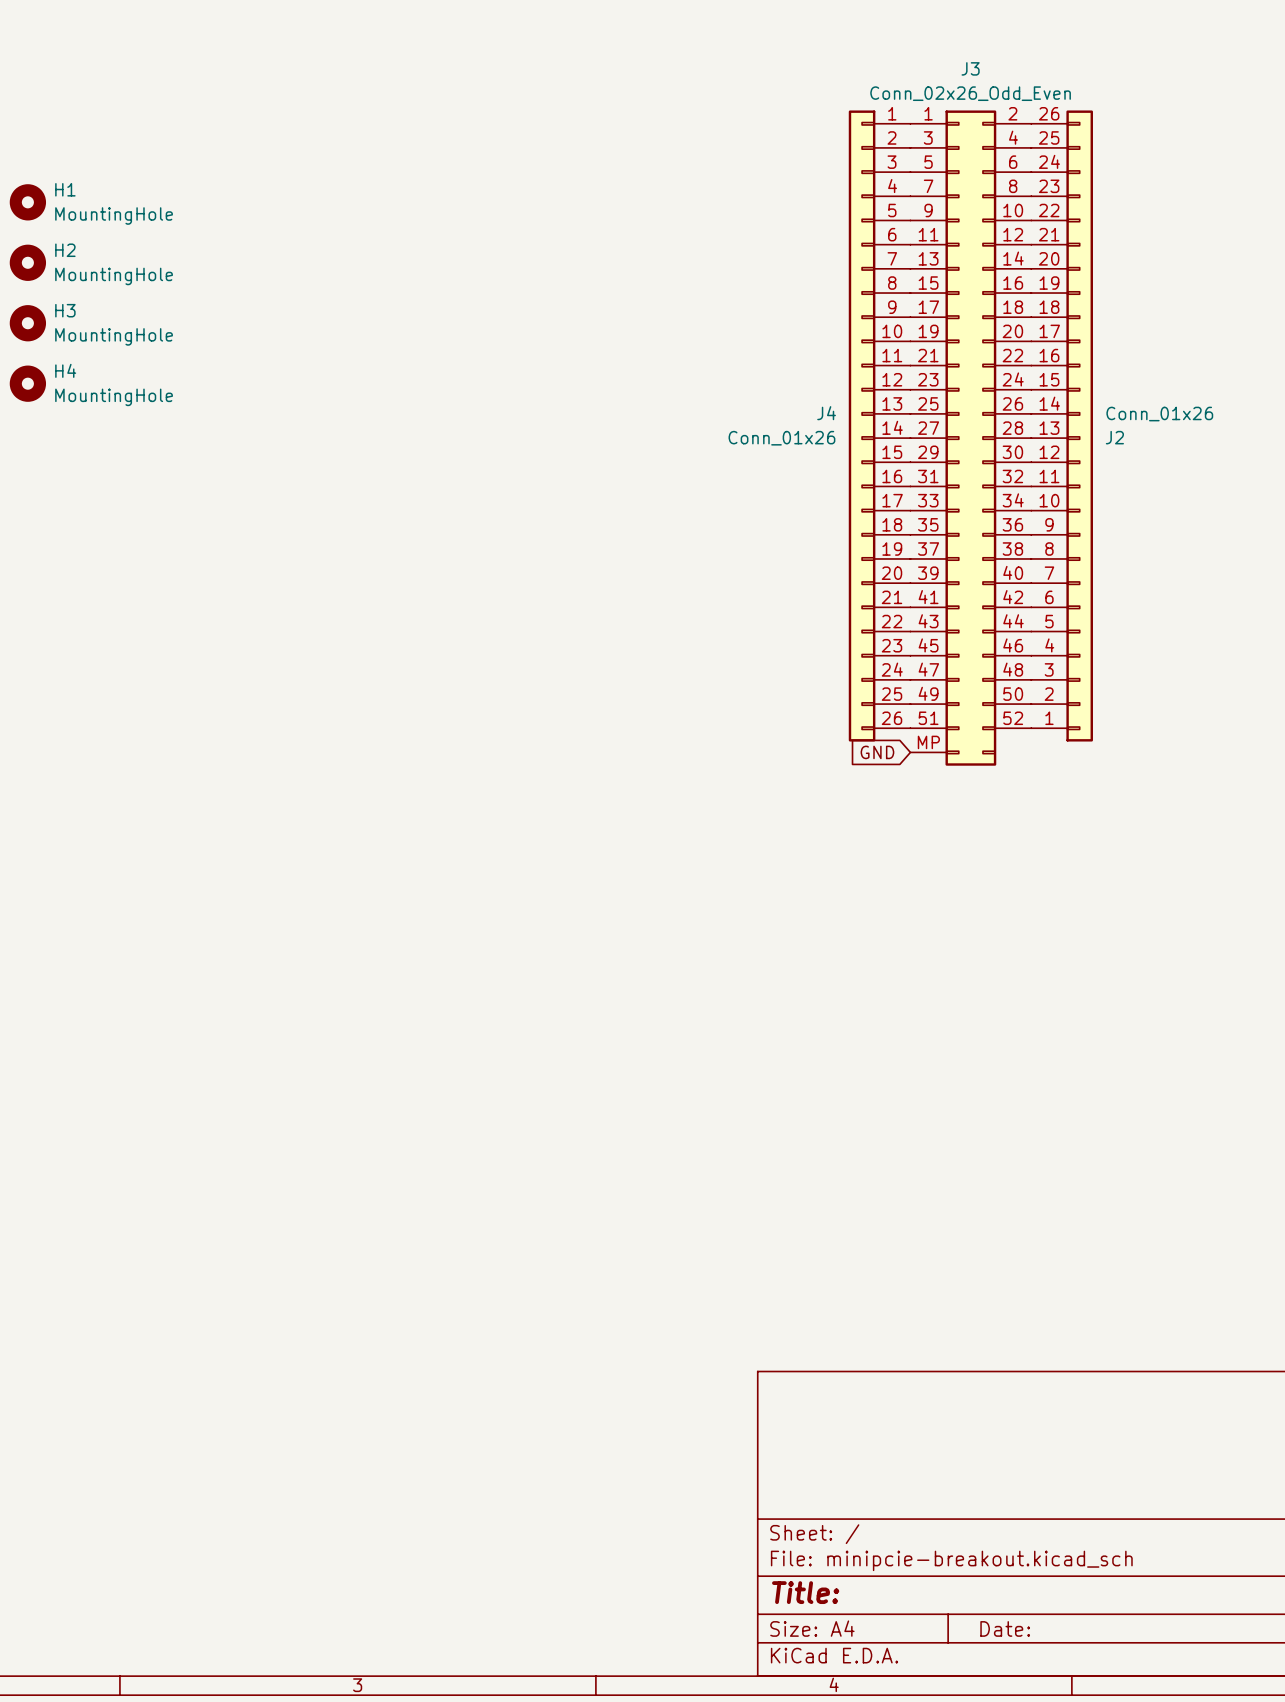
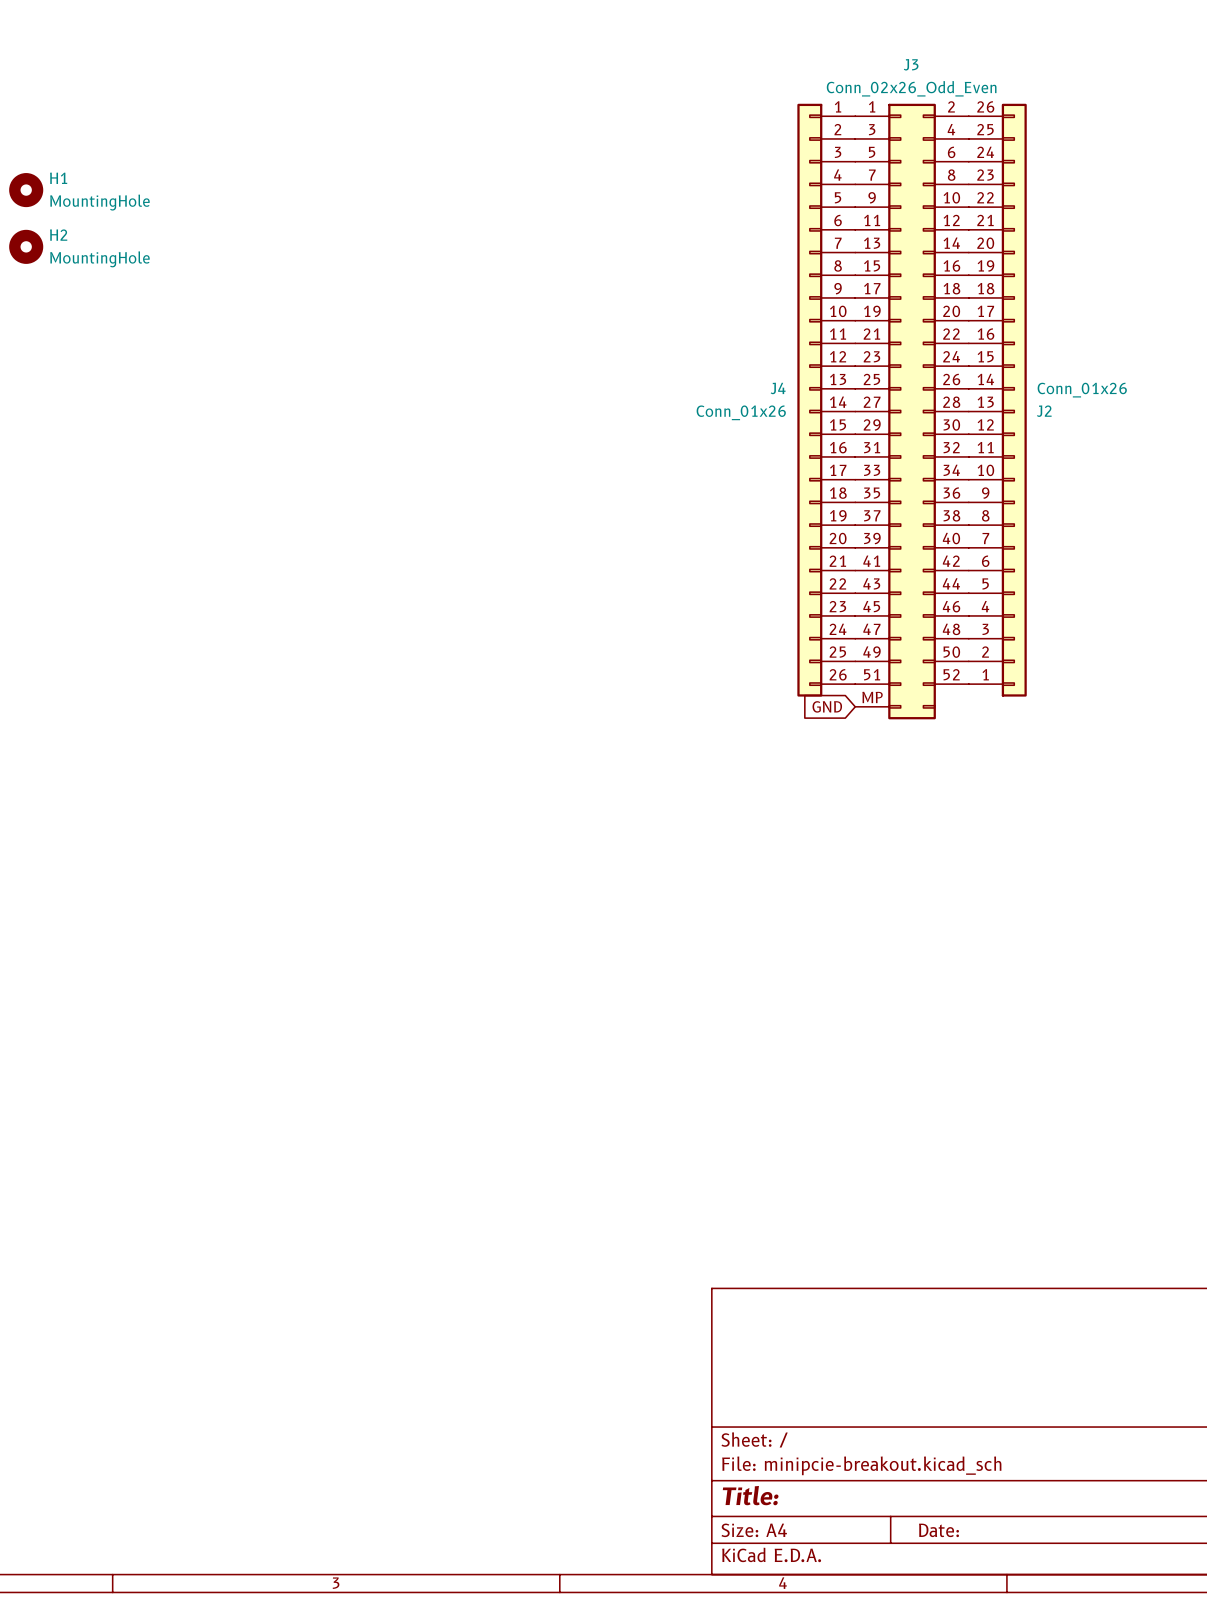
H3: MountingHole (27, 323) -> none
H4: MountingHole (27, 383) -> none

